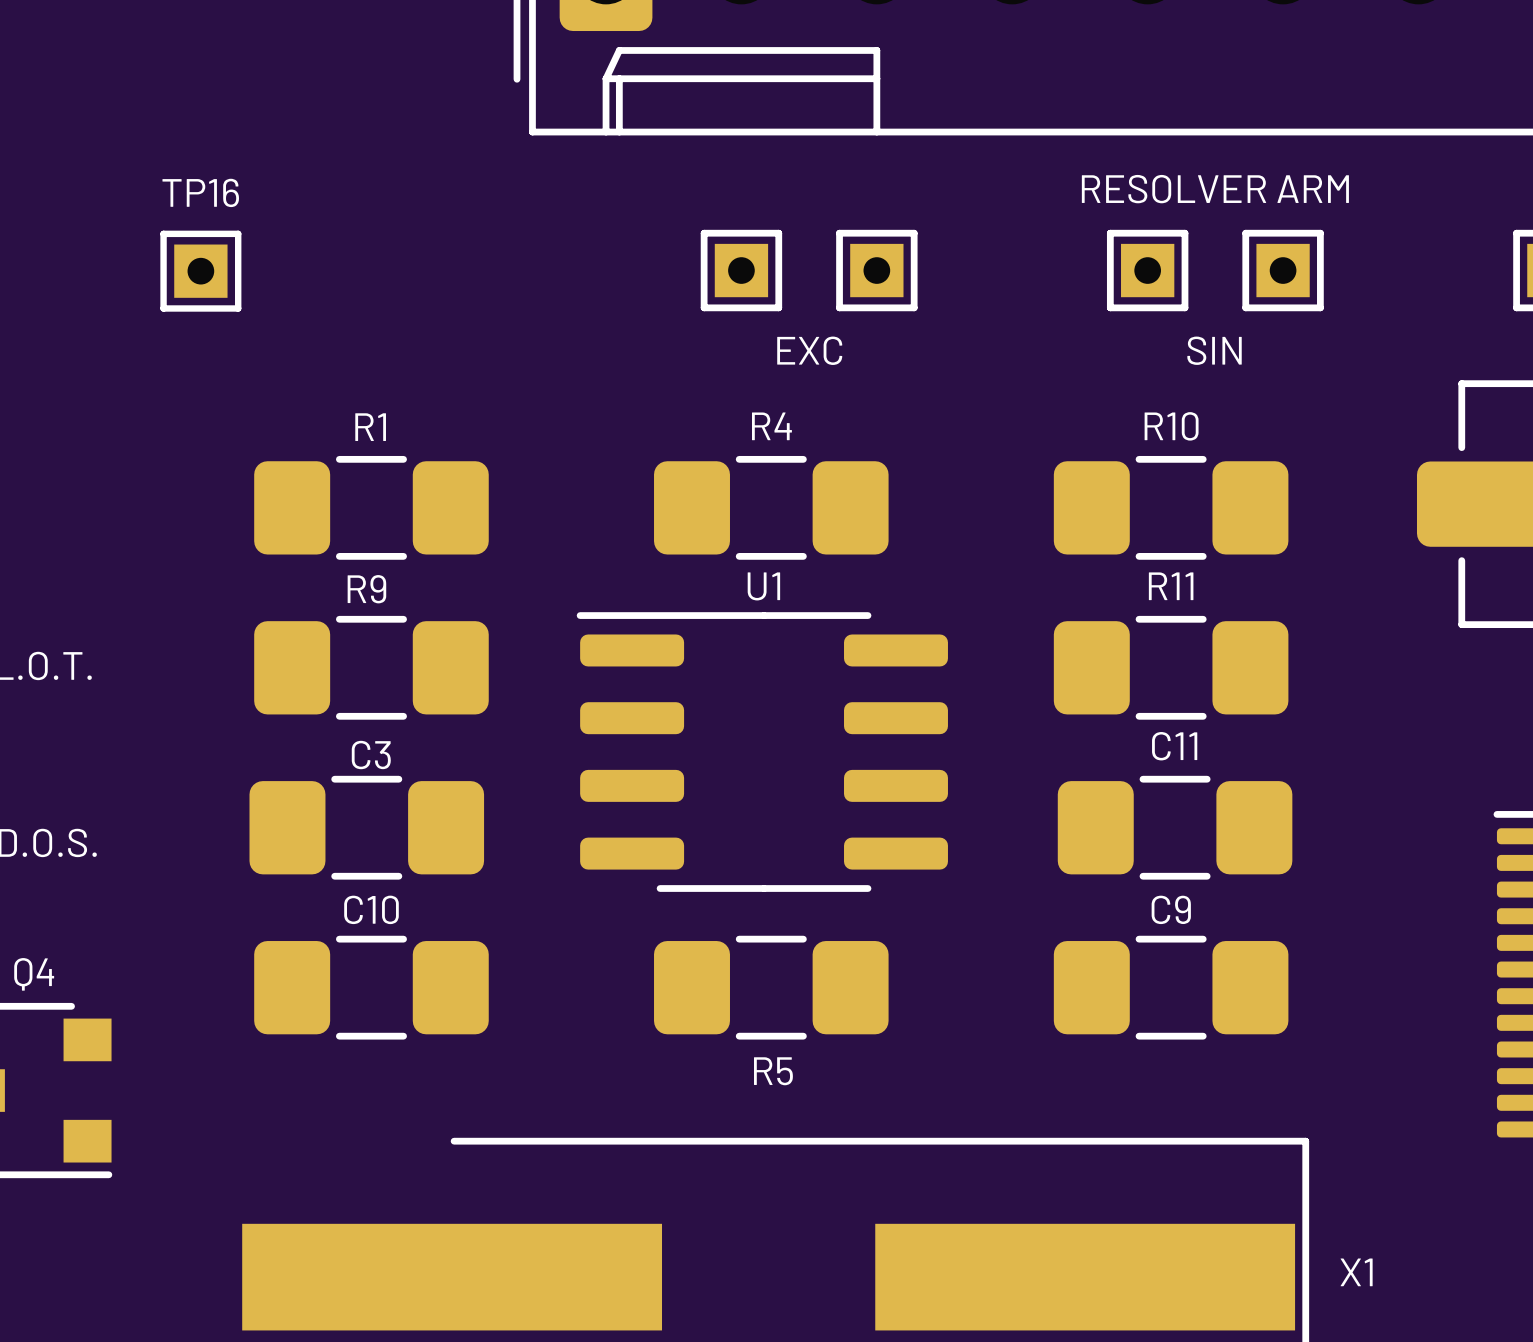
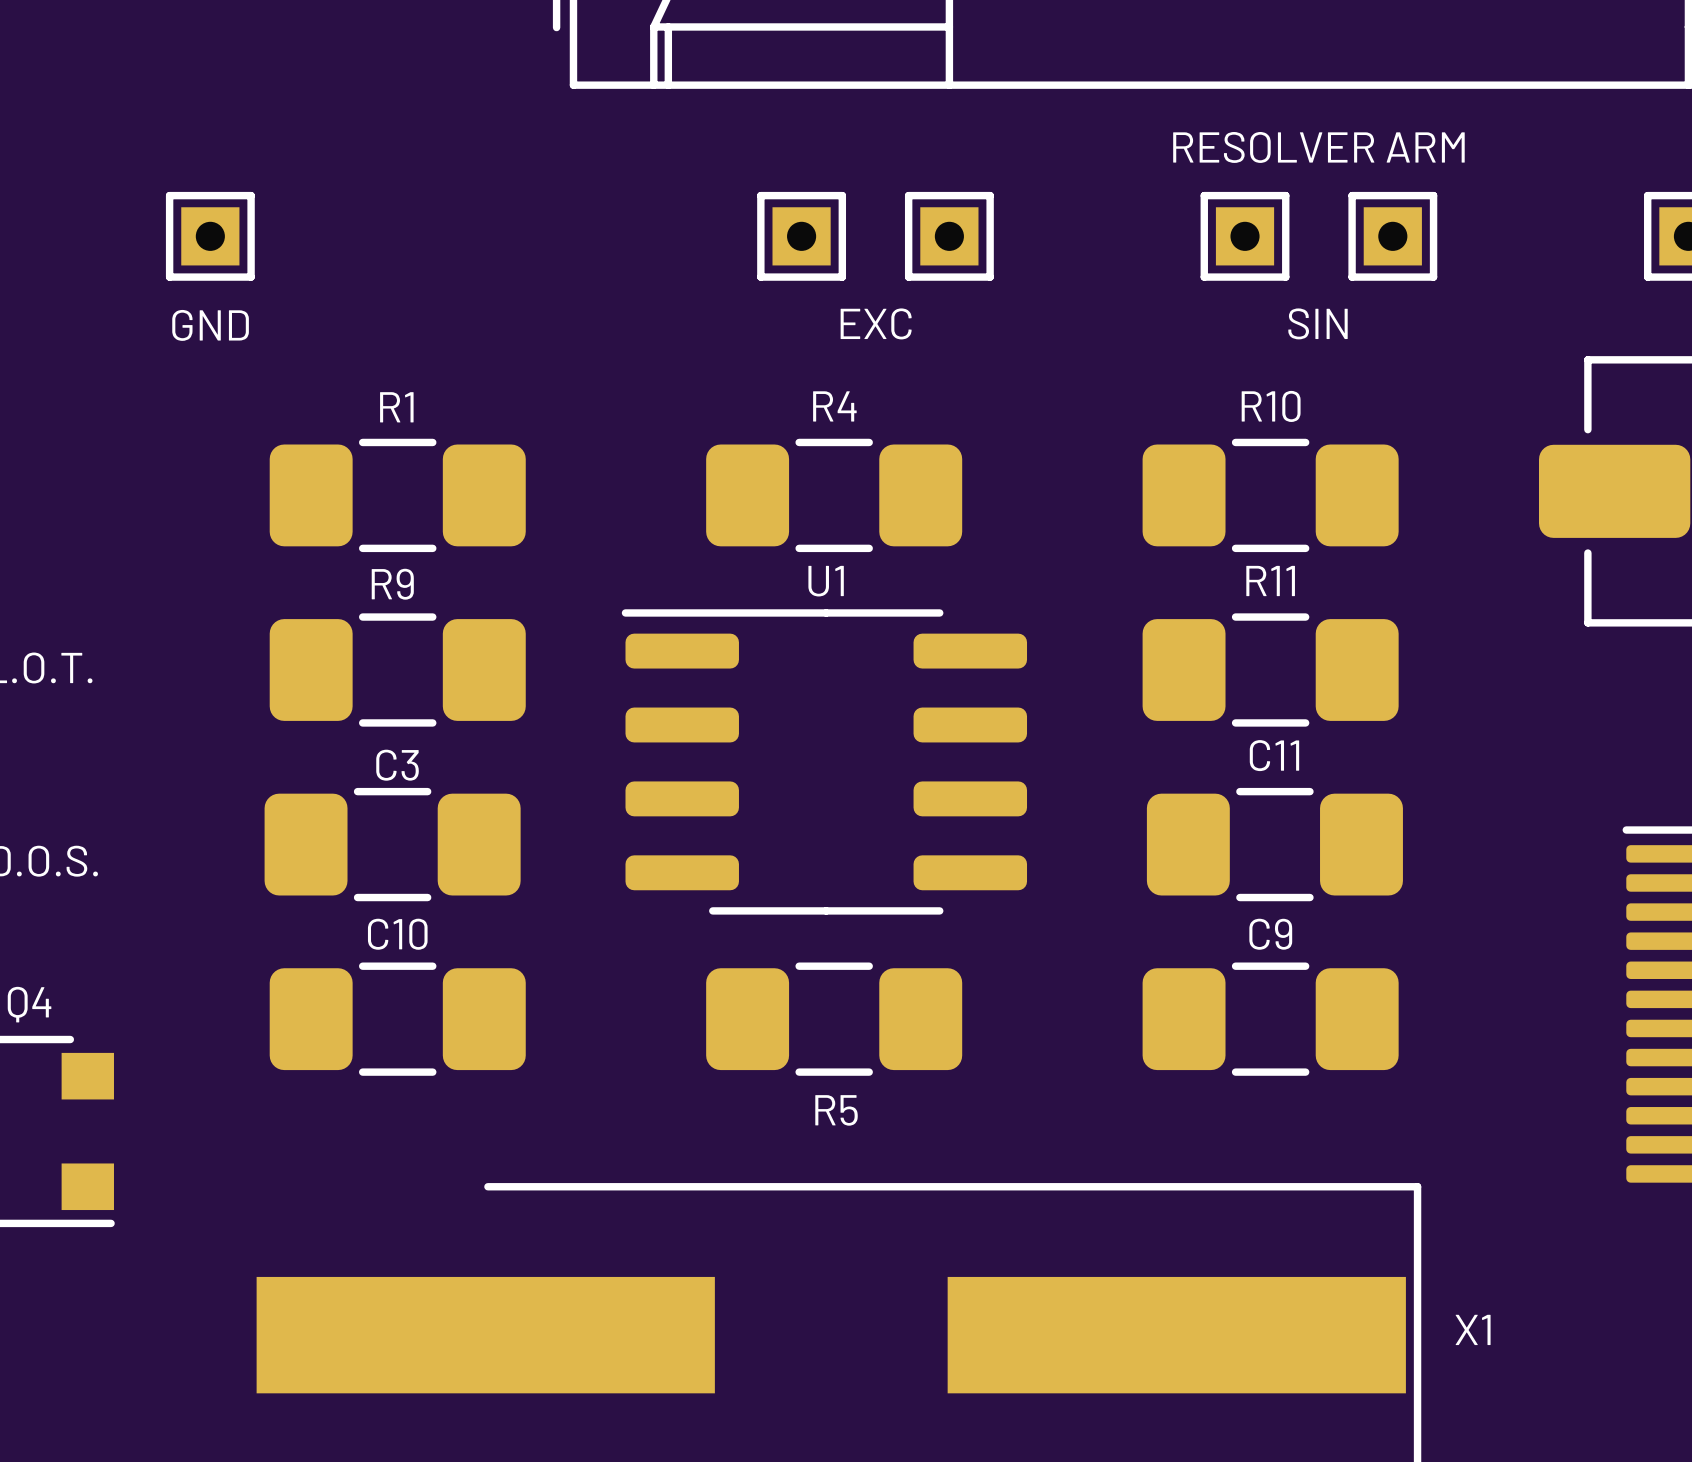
part: none -> GND (210, 236)
TP16: (200, 271) -> none

